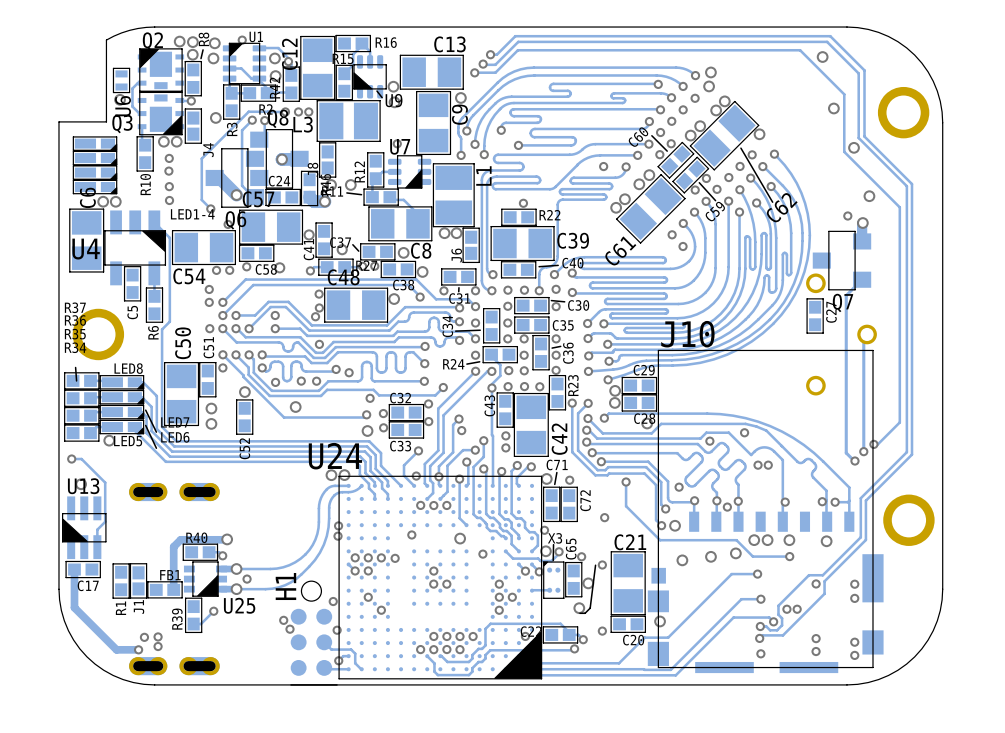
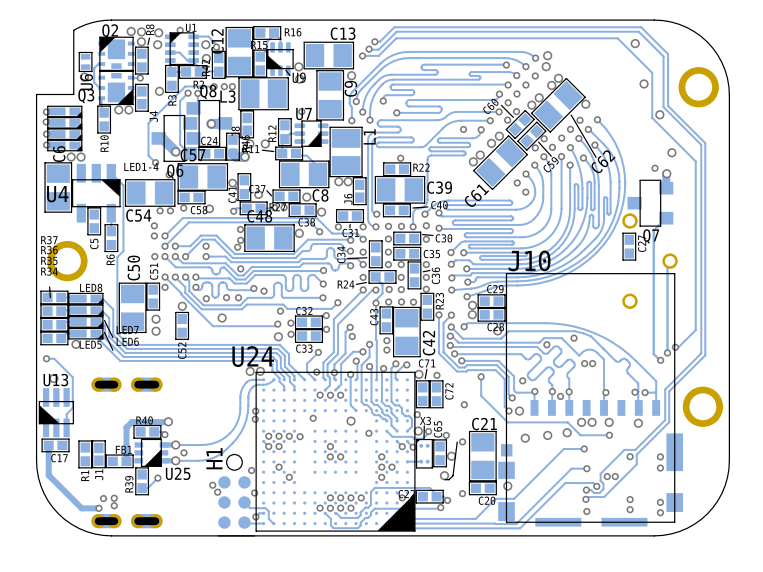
via: none -> (46, 112)
via: none -> (46, 121)
via: (169, 158) -> none
via: (168, 171) -> none
via: none -> (46, 134)
via: none -> (46, 145)
via: (169, 186) -> none
via: (169, 200) -> none

